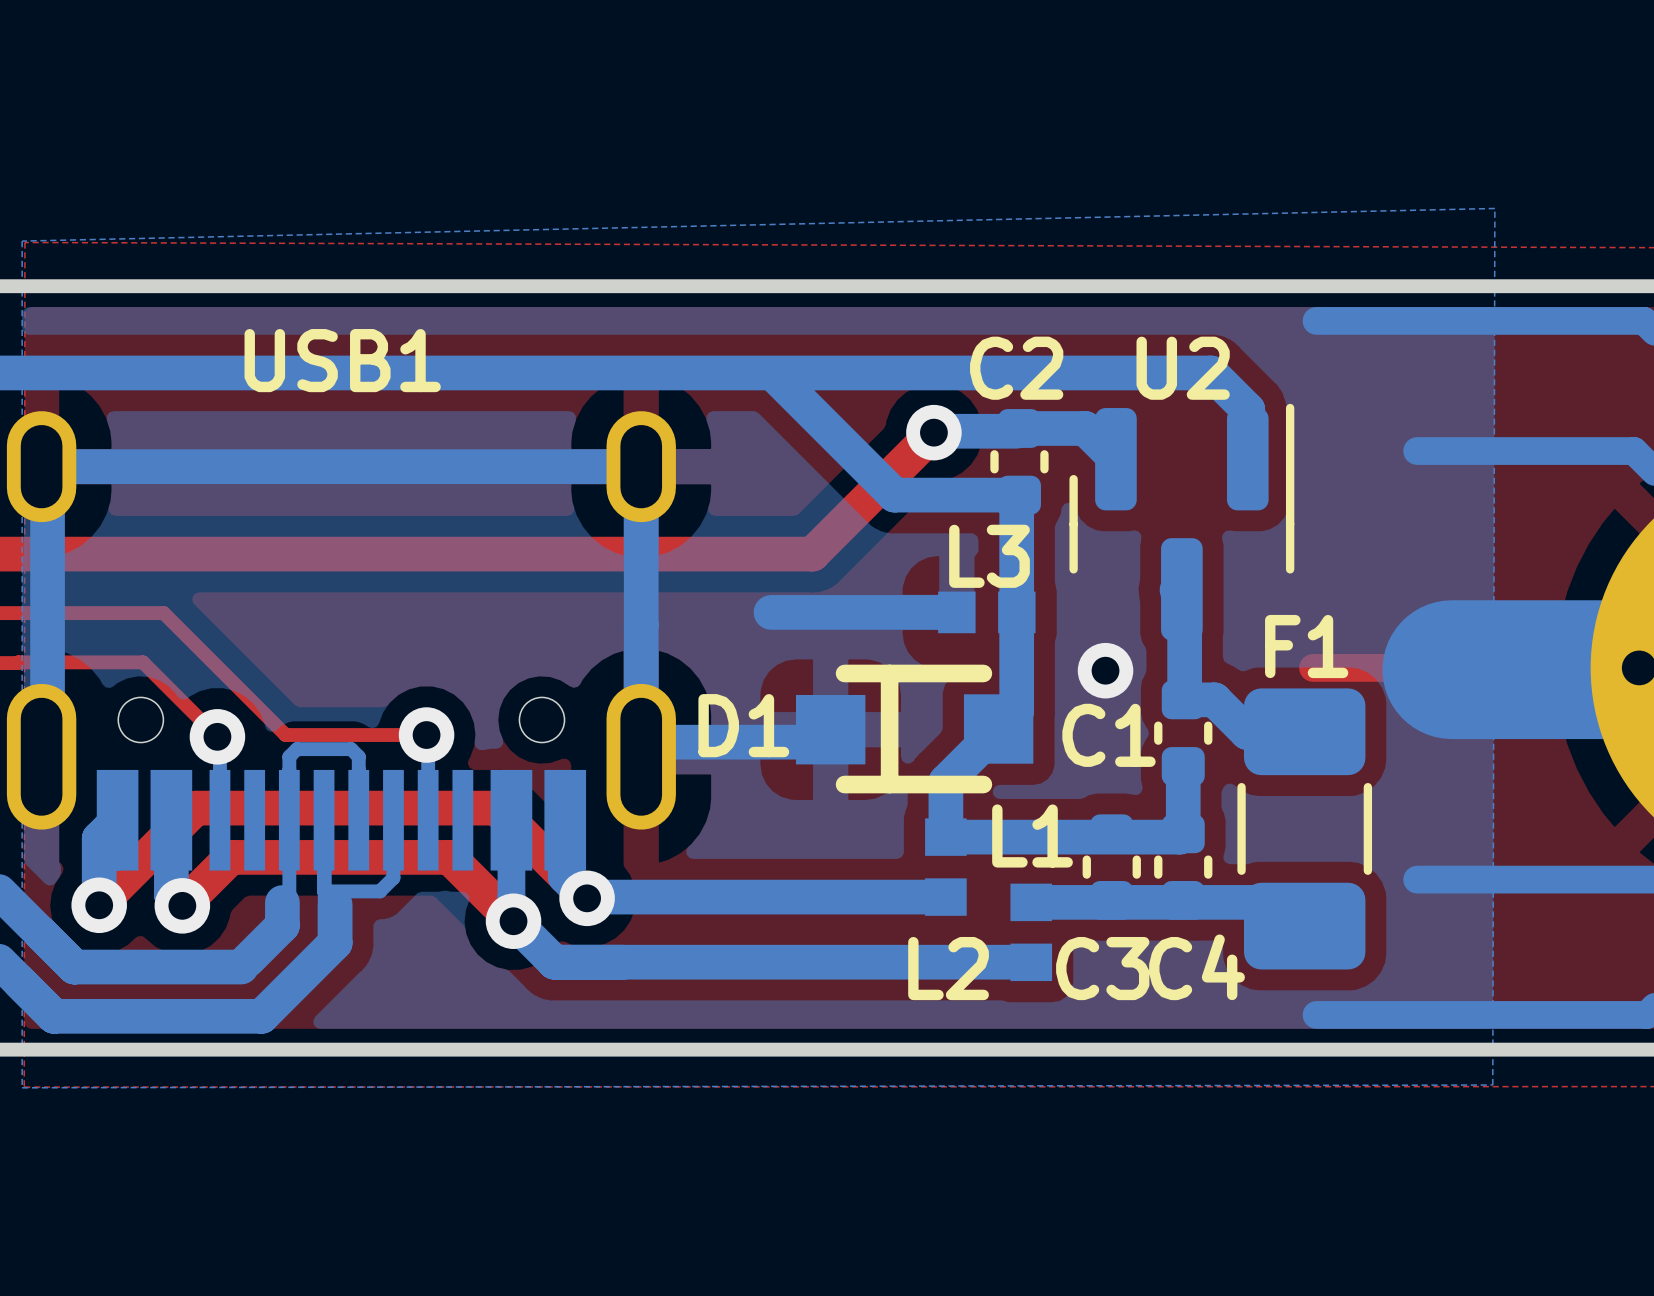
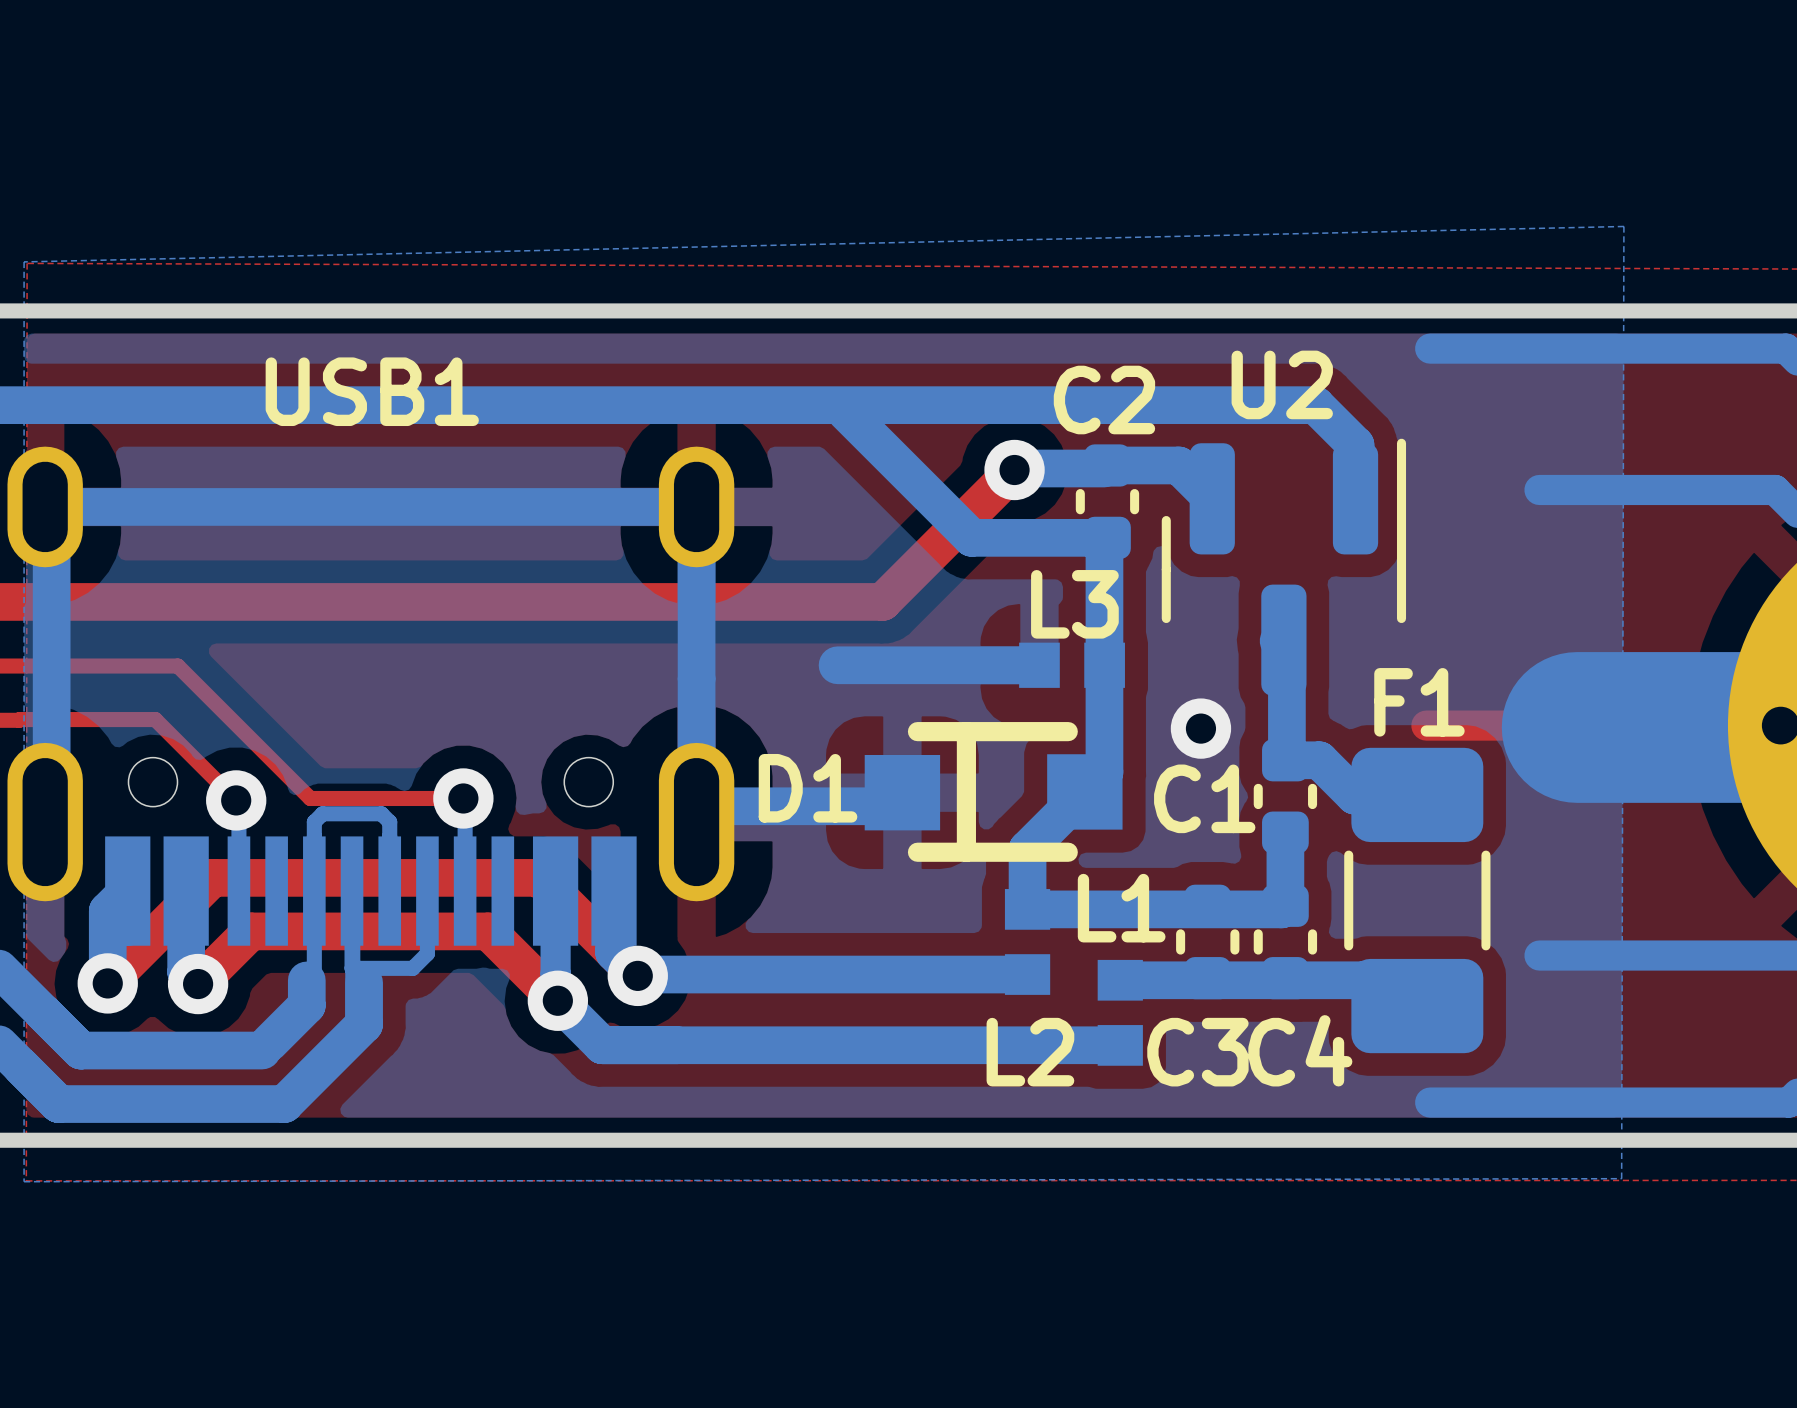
U2 name position: U2 (1183, 368) -> U2 (1282, 384)

